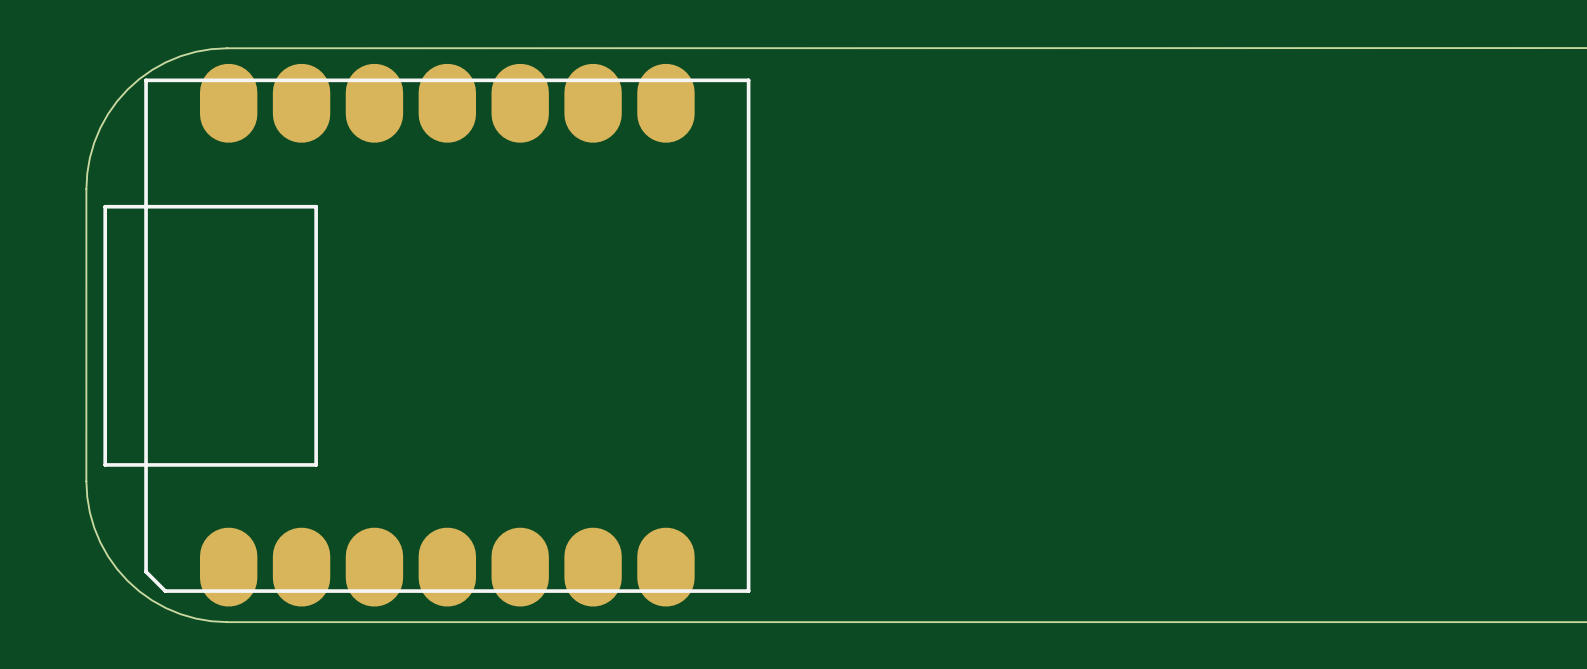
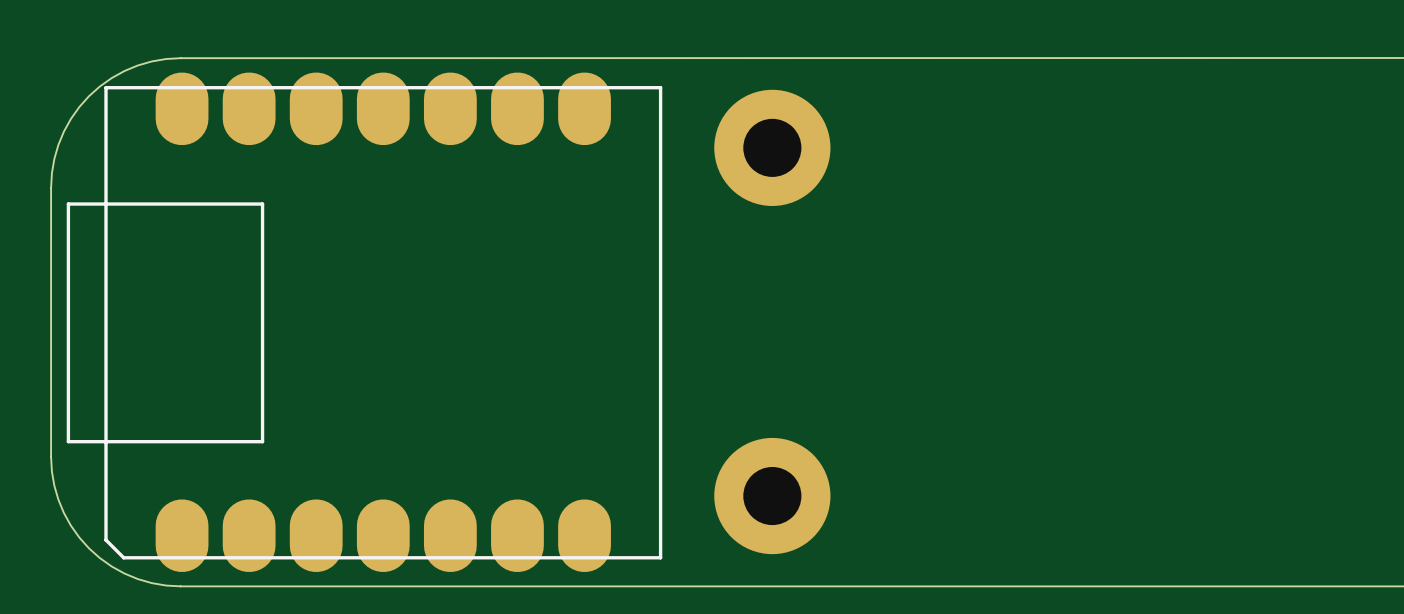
part: none -> (772, 147)
part: none -> (772, 496)

